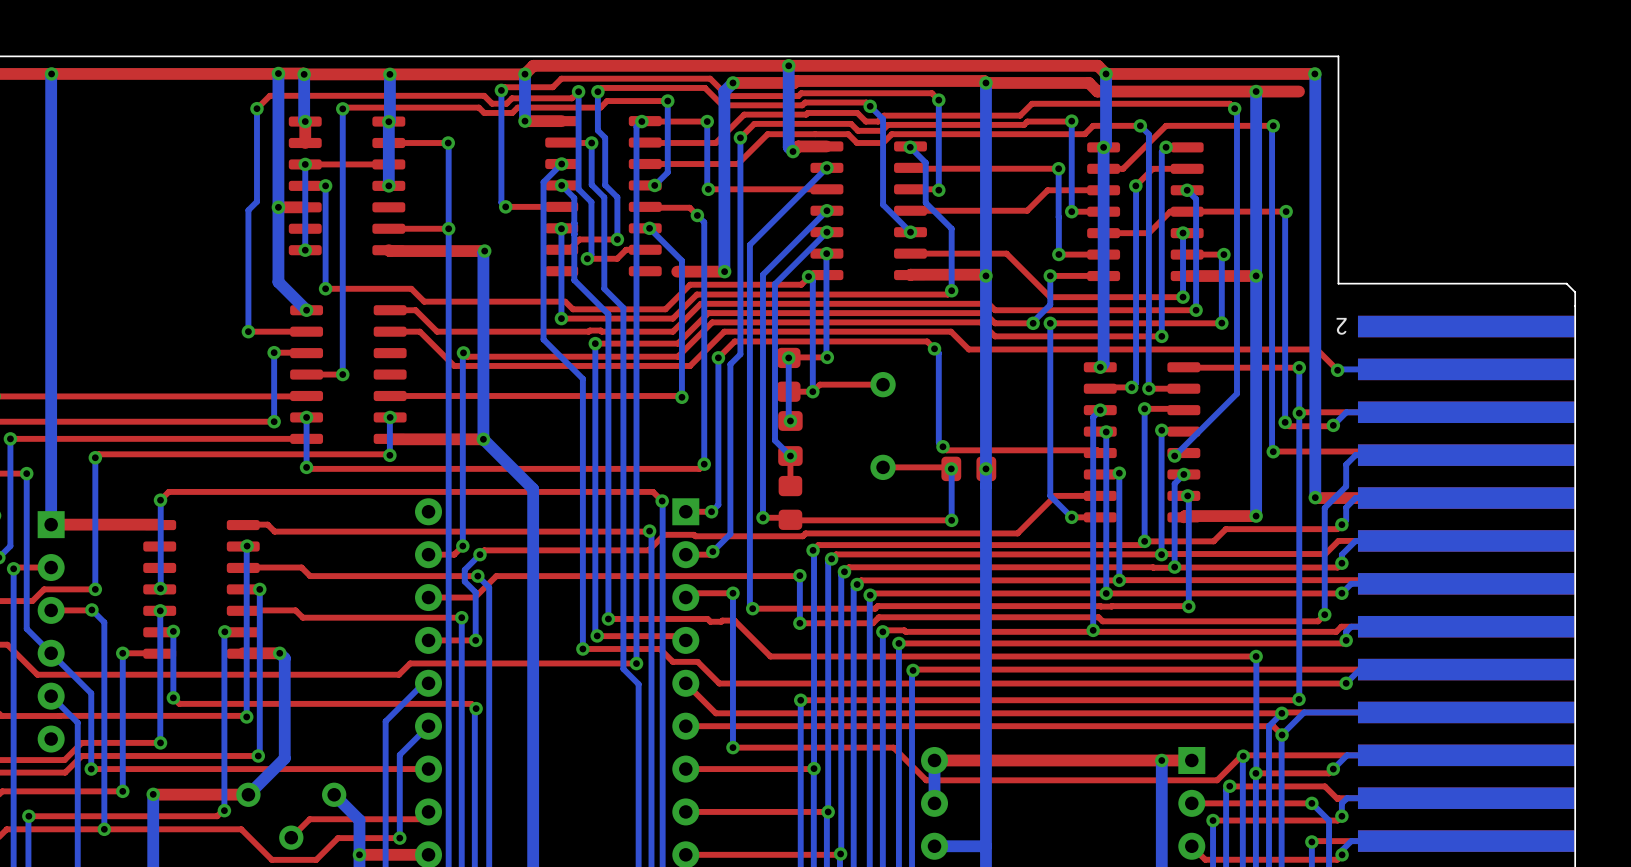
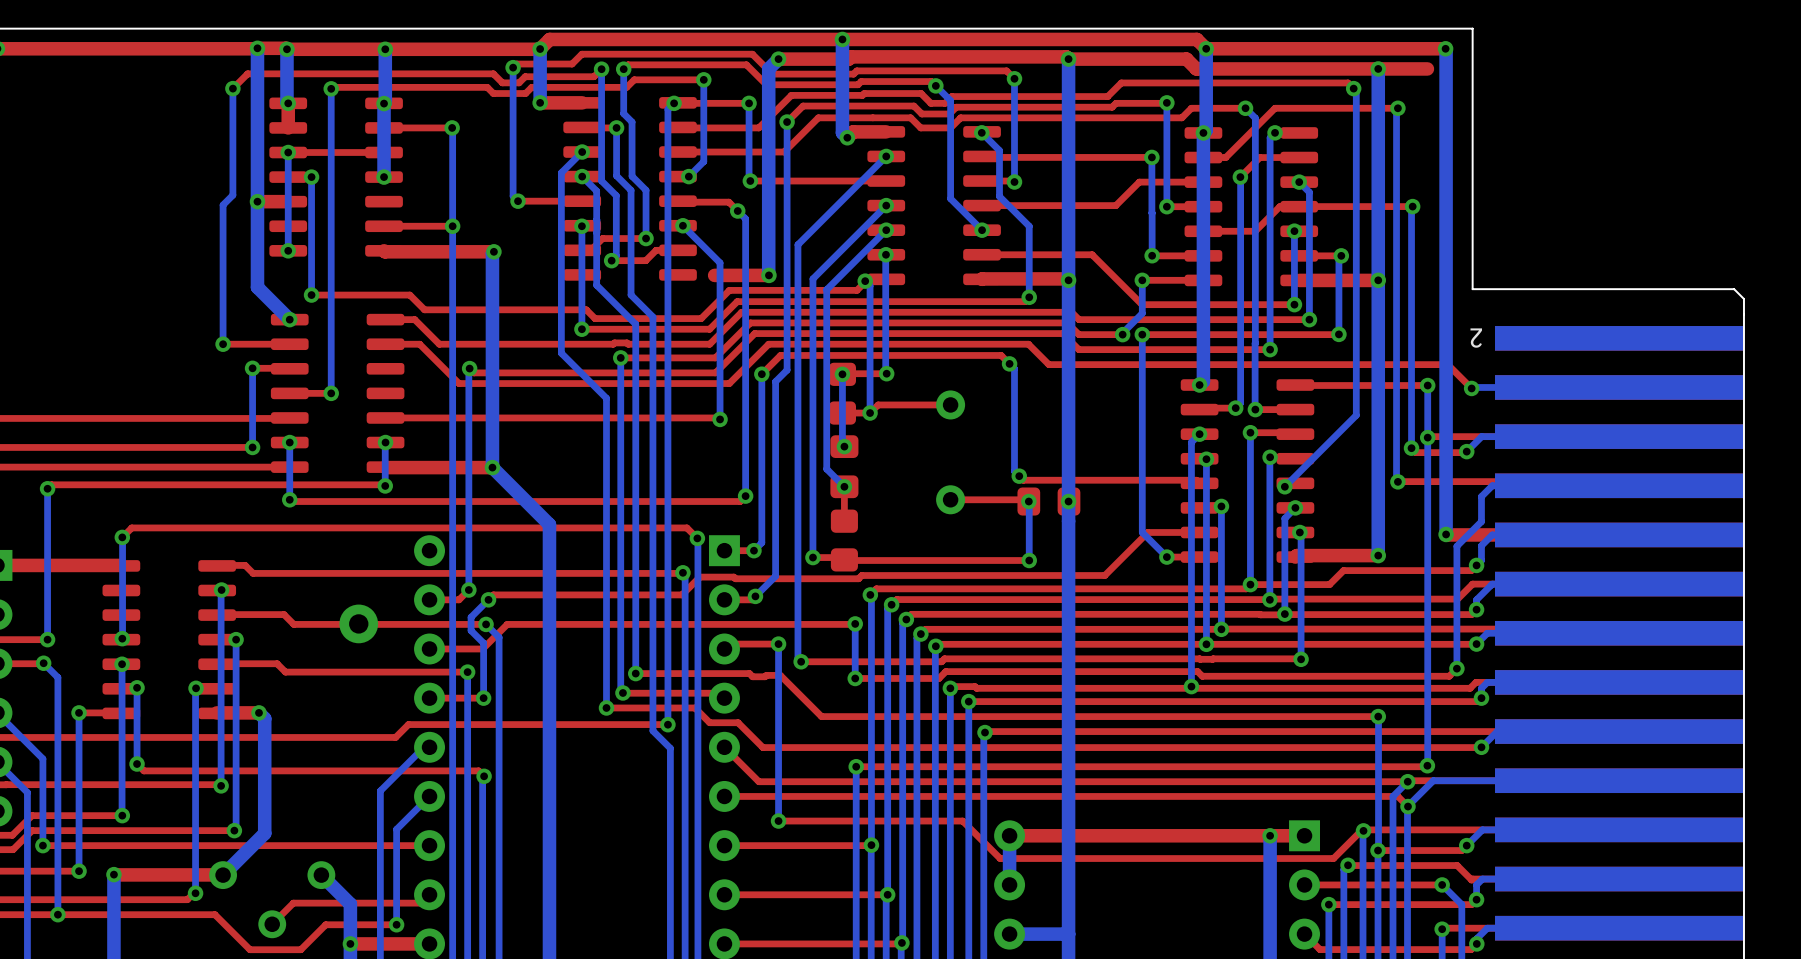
part: none -> (358, 623)

